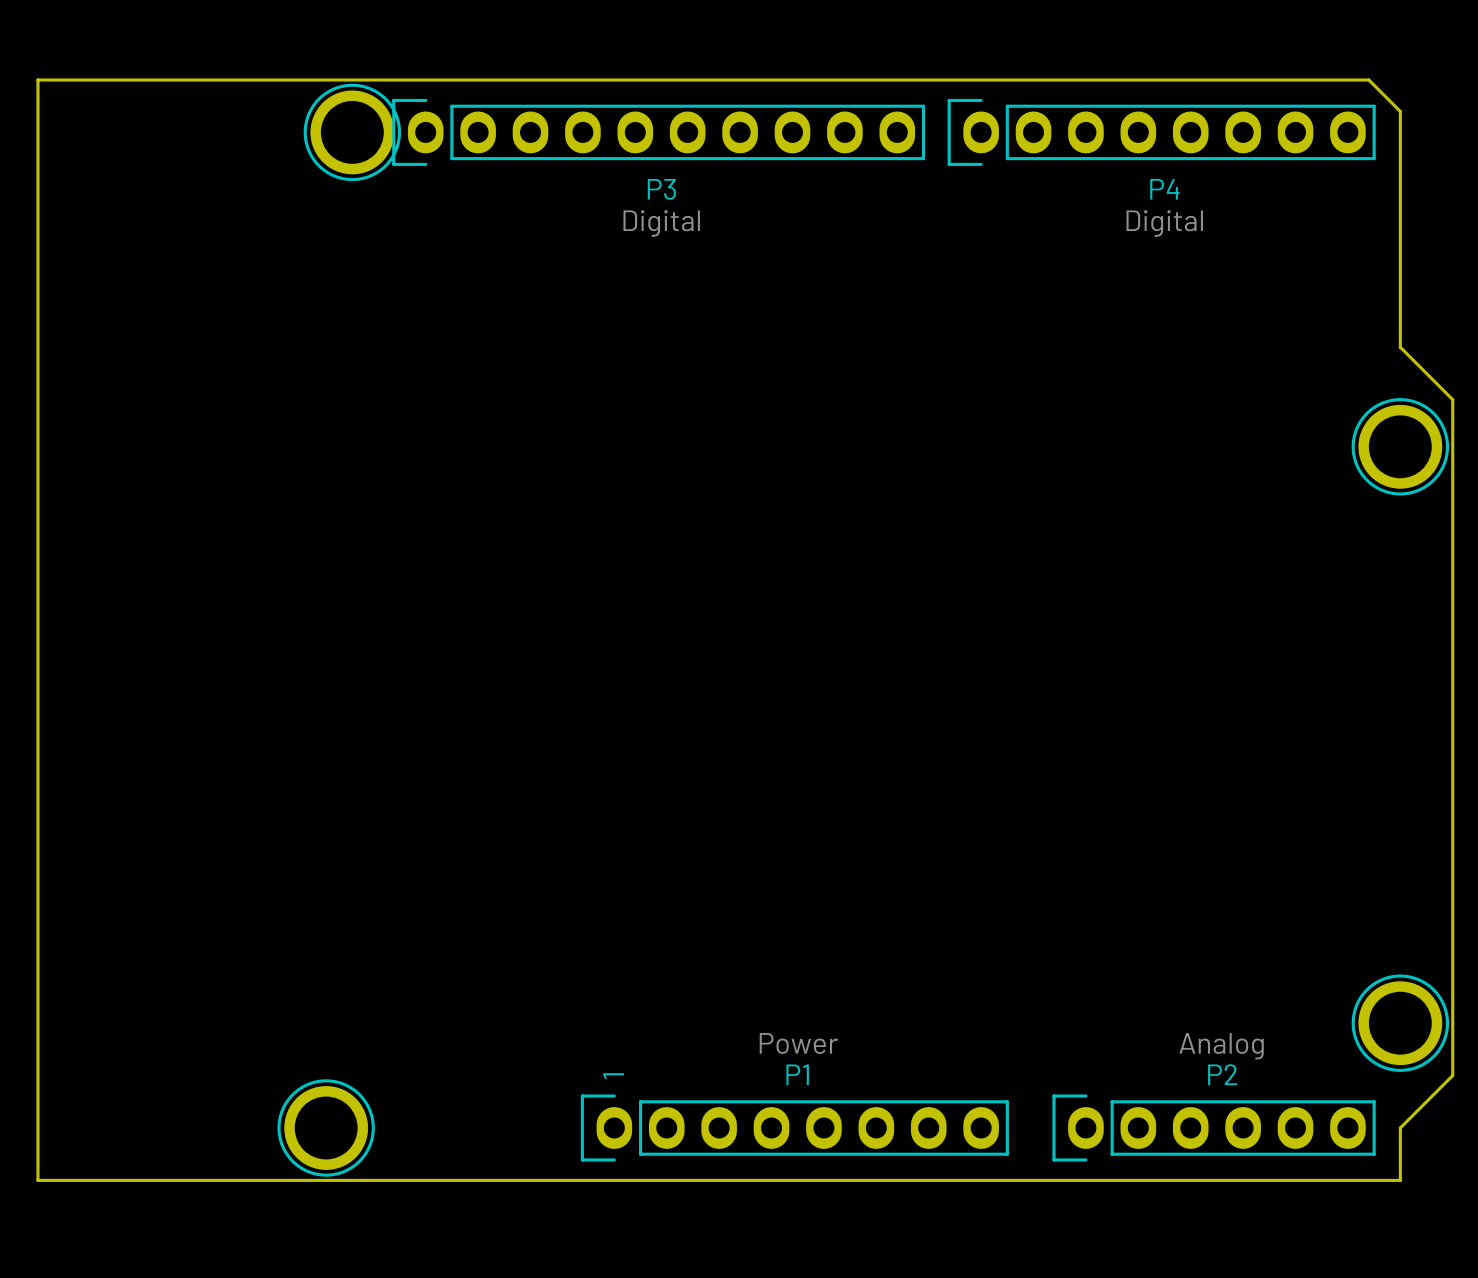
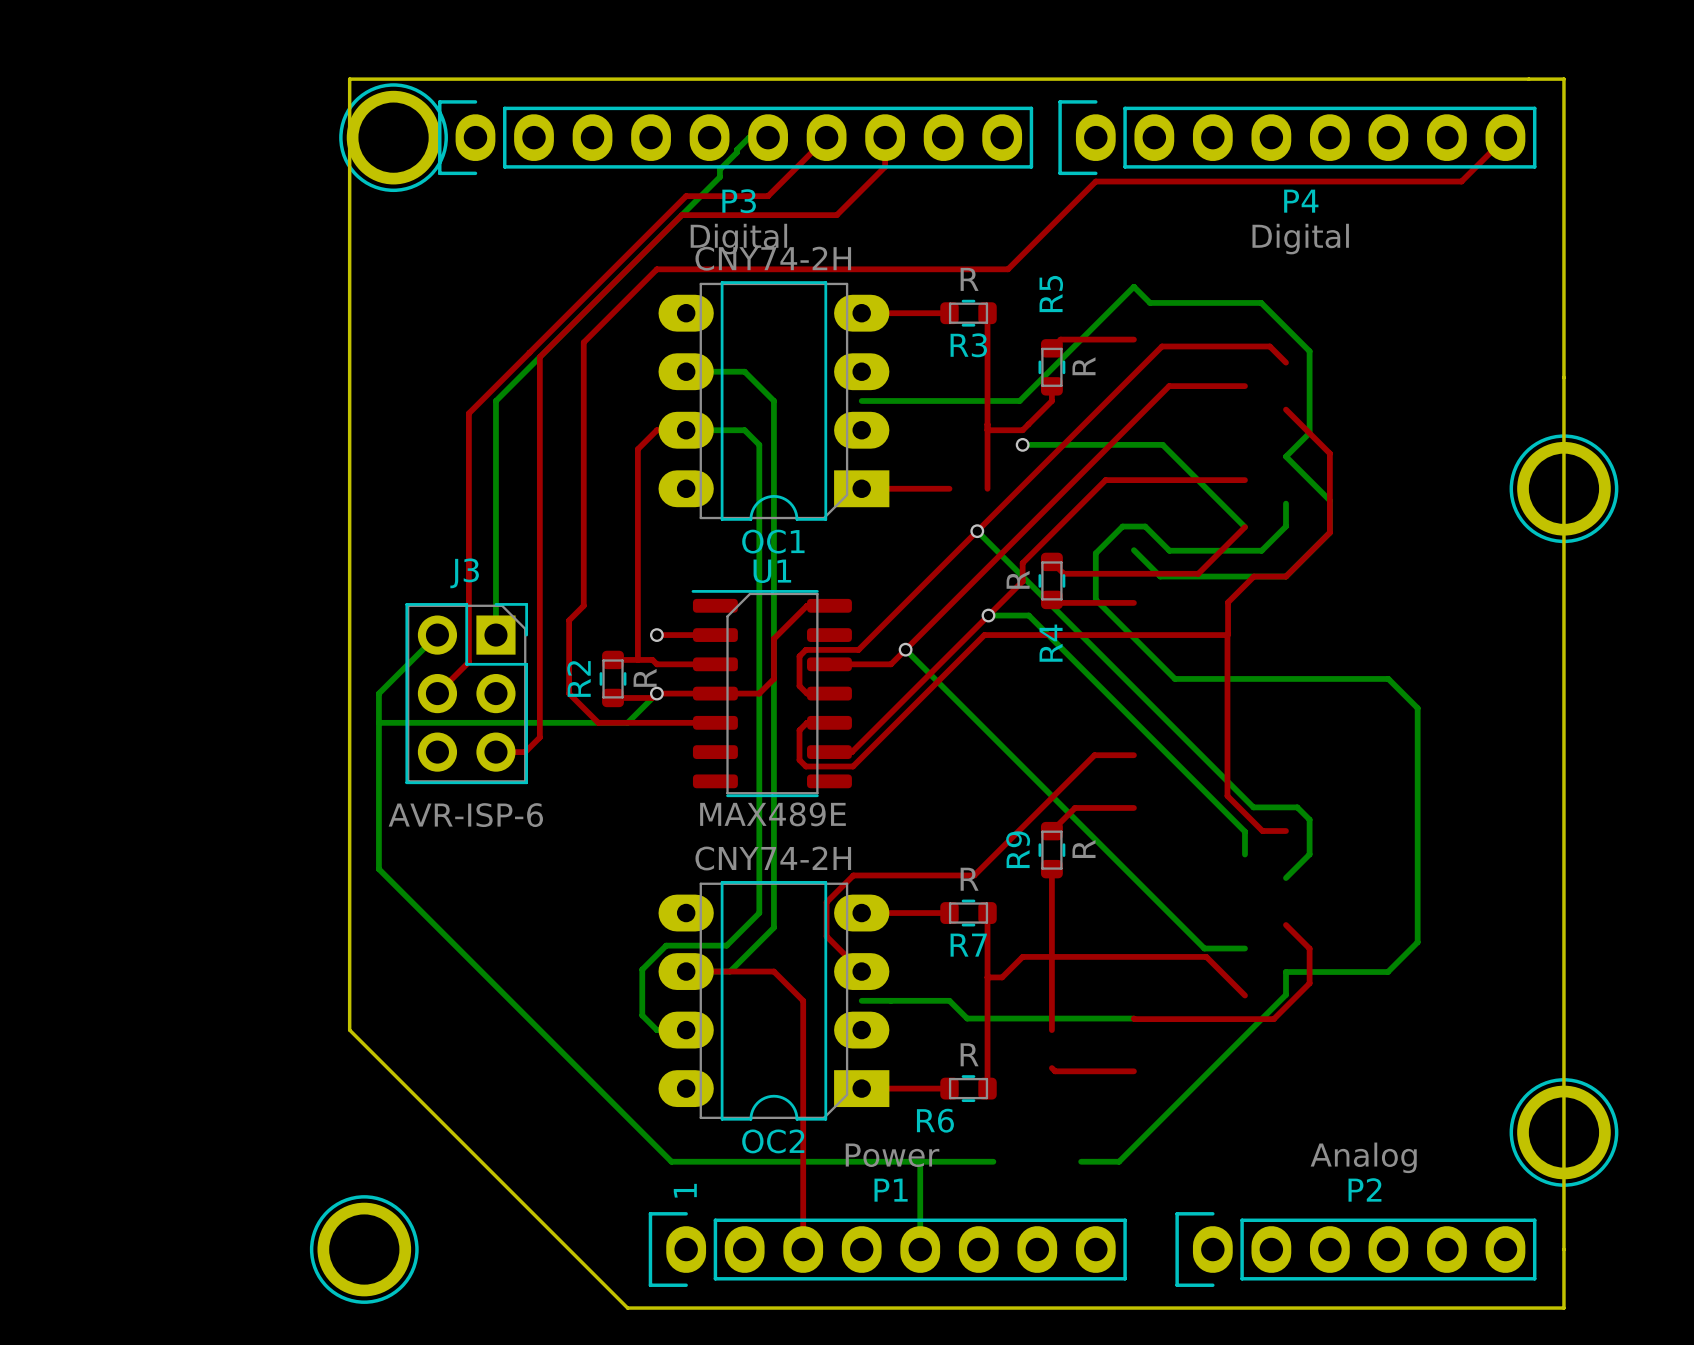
board edge: (313, 80) (37, 80) (37, 1180) (561, 1180) -> (349, 79) (349, 1030) (627, 1308)
board edge: (1368, 80) (1400, 111) -> (1528, 79) (1563, 79) (1563, 114)
bottom track: none -> (768, 137) (749, 137) (719, 168) (719, 177) (495, 401) (495, 635)
top track: none -> (826, 137) (768, 196) (686, 196) (468, 413) (468, 662) (437, 693)
top track: none -> (885, 137) (885, 166) (836, 215) (681, 215) (539, 357) (539, 737) (525, 752) (495, 752)
top track: none -> (1505, 137) (1461, 181) (1095, 181) (1008, 269) (656, 269) (583, 342) (583, 605) (569, 620) (569, 693) (598, 722) (715, 722)
top track: none -> (861, 313) (949, 313)
R3: none -> R (968, 313)
top track: none -> (987, 313) (987, 488)
top track: none -> (1133, 339) (1060, 339) (1051, 348)
top track: none -> (1285, 362) (1269, 346) (1161, 346) (858, 649) (805, 649) (799, 656) (799, 686) (807, 693) (829, 693)
R5: none -> R (1051, 367)
bottom track: none -> (686, 371) (744, 371) (773, 400) (773, 927) (730, 971) (686, 971)
board edge: (1400, 347) (1452, 399) (1452, 1075) (1400, 1127) -> (1563, 377) (1563, 1249)
top track: none -> (1244, 386) (1169, 386) (890, 664) (829, 664)
top track: none -> (1051, 386) (1051, 400) (1022, 430) (987, 430)
OC1: none -> CNY74-2H (773, 400)
bottom track: none -> (861, 400) (1019, 400) (1133, 286) (1150, 302) (1261, 302) (1309, 351) (1309, 433) (1285, 456) (1329, 500) (1329, 532) (1285, 576) (1160, 576) (1133, 550)
top track: none -> (1285, 409) (1329, 453) (1329, 532) (1285, 576) (1253, 576) (1228, 602) (1227, 635)
top track: none -> (686, 430) (656, 430) (637, 449) (637, 659)
bottom track: none -> (686, 430) (744, 430) (759, 444) (759, 913) (726, 945) (666, 945) (642, 969) (642, 1015) (656, 1030) (686, 1030)
bottom track: none -> (1022, 444) (1162, 444) (1244, 527)
via: none -> (1022, 444)
top track: none -> (1244, 480) (1105, 480) (1022, 563) (1022, 581) (851, 752) (829, 752)
top track: none -> (861, 488) (949, 488)
bottom track: none -> (1285, 503) (1285, 526) (1261, 550) (1169, 550) (1145, 526) (1122, 526) (1095, 553) (1095, 599) (1175, 678) (1388, 678) (1417, 708) (1417, 942) (1387, 972) (1285, 972) (1285, 994) (1119, 1161) (1081, 1161)
top track: none -> (1244, 527) (1198, 573) (1063, 573) (1051, 561)
bottom track: none -> (977, 531) (1253, 807) (1297, 807) (1309, 819) (1309, 854) (1285, 878)
via: none -> (977, 531)
R4: none -> R (1051, 580)
top track: none -> (1051, 599) (1054, 602) (1133, 602)
top track: none -> (829, 605) (807, 605) (773, 638) (773, 678) (759, 693) (656, 693) (652, 697) (613, 697)
bottom track: none -> (988, 615) (1028, 615) (1244, 831) (1244, 854)
via: none -> (988, 615)
bottom track: none -> (437, 635) (378, 693) (378, 869) (671, 1161) (993, 1161)
top track: none -> (656, 635) (715, 635)
via: none -> (656, 635)
top track: none -> (1227, 635) (984, 635) (853, 766) (805, 766) (799, 760) (799, 730) (807, 722) (829, 722)
top track: none -> (1227, 635) (1227, 795) (1262, 831) (1285, 831)
bottom track: none -> (905, 649) (1204, 948) (1244, 948)
via: none -> (905, 649)
top track: none -> (613, 659) (652, 659) (656, 664) (715, 664)
R2: none -> R (613, 678)
J3: none -> AVR-ISP-6 (466, 693)
bottom track: none -> (656, 693) (627, 722) (378, 722)
via: none -> (656, 693)
U1: none -> MAX489E (771, 693)
top track: none -> (1133, 755) (1094, 755) (974, 875) (853, 875) (826, 902) (826, 936) (861, 971)
top track: none -> (1133, 807) (1075, 807) (1051, 831)
R9: none -> R (1051, 850)
top track: none -> (1051, 869) (1051, 1030)
top track: none -> (861, 913) (949, 913)
R7: none -> R (968, 913)
top track: none -> (987, 913) (987, 1088)
top track: none -> (1285, 925) (1309, 948) (1309, 983) (1273, 1019) (1133, 1018)
top track: none -> (686, 971) (773, 971) (803, 1000) (803, 1249)
top track: none -> (987, 977) (1002, 977) (1022, 956) (1206, 956) (1244, 995)
OC2: none -> CNY74-2H (773, 1000)
bottom track: none -> (861, 1000) (949, 1000) (967, 1018) (1133, 1018)
top track: none -> (1051, 1068) (1055, 1071) (1133, 1071)
top track: none -> (861, 1088) (949, 1088)
R6: none -> R (968, 1088)
bottom track: none -> (920, 1161) (920, 1249)

